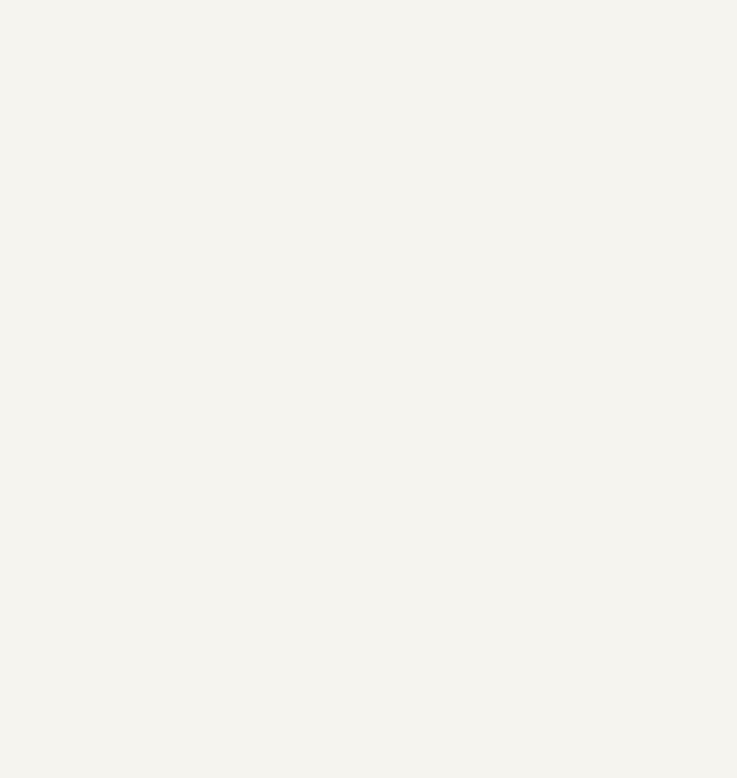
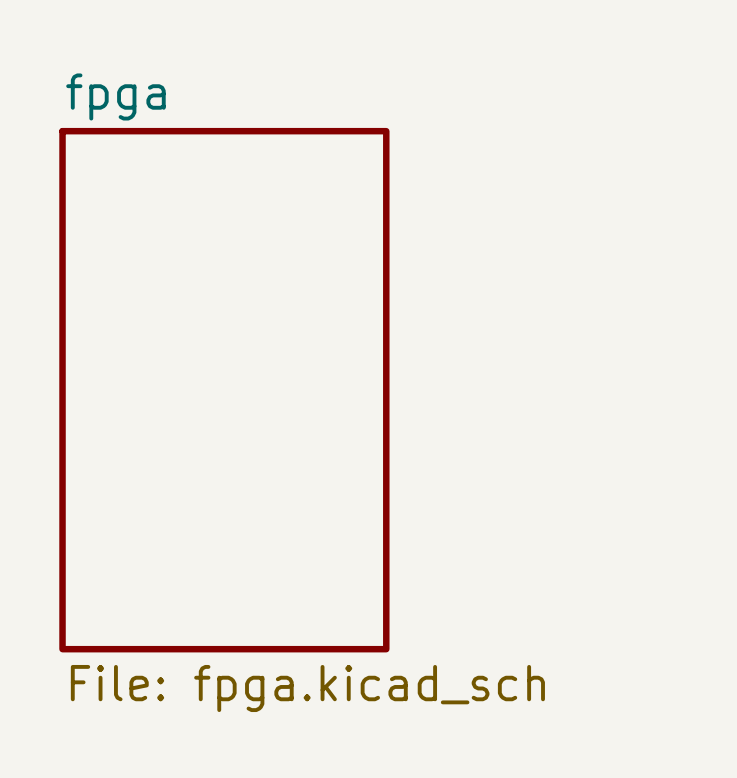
sheet fpga: none -> File: fpga.kicad_sch (224, 390)

